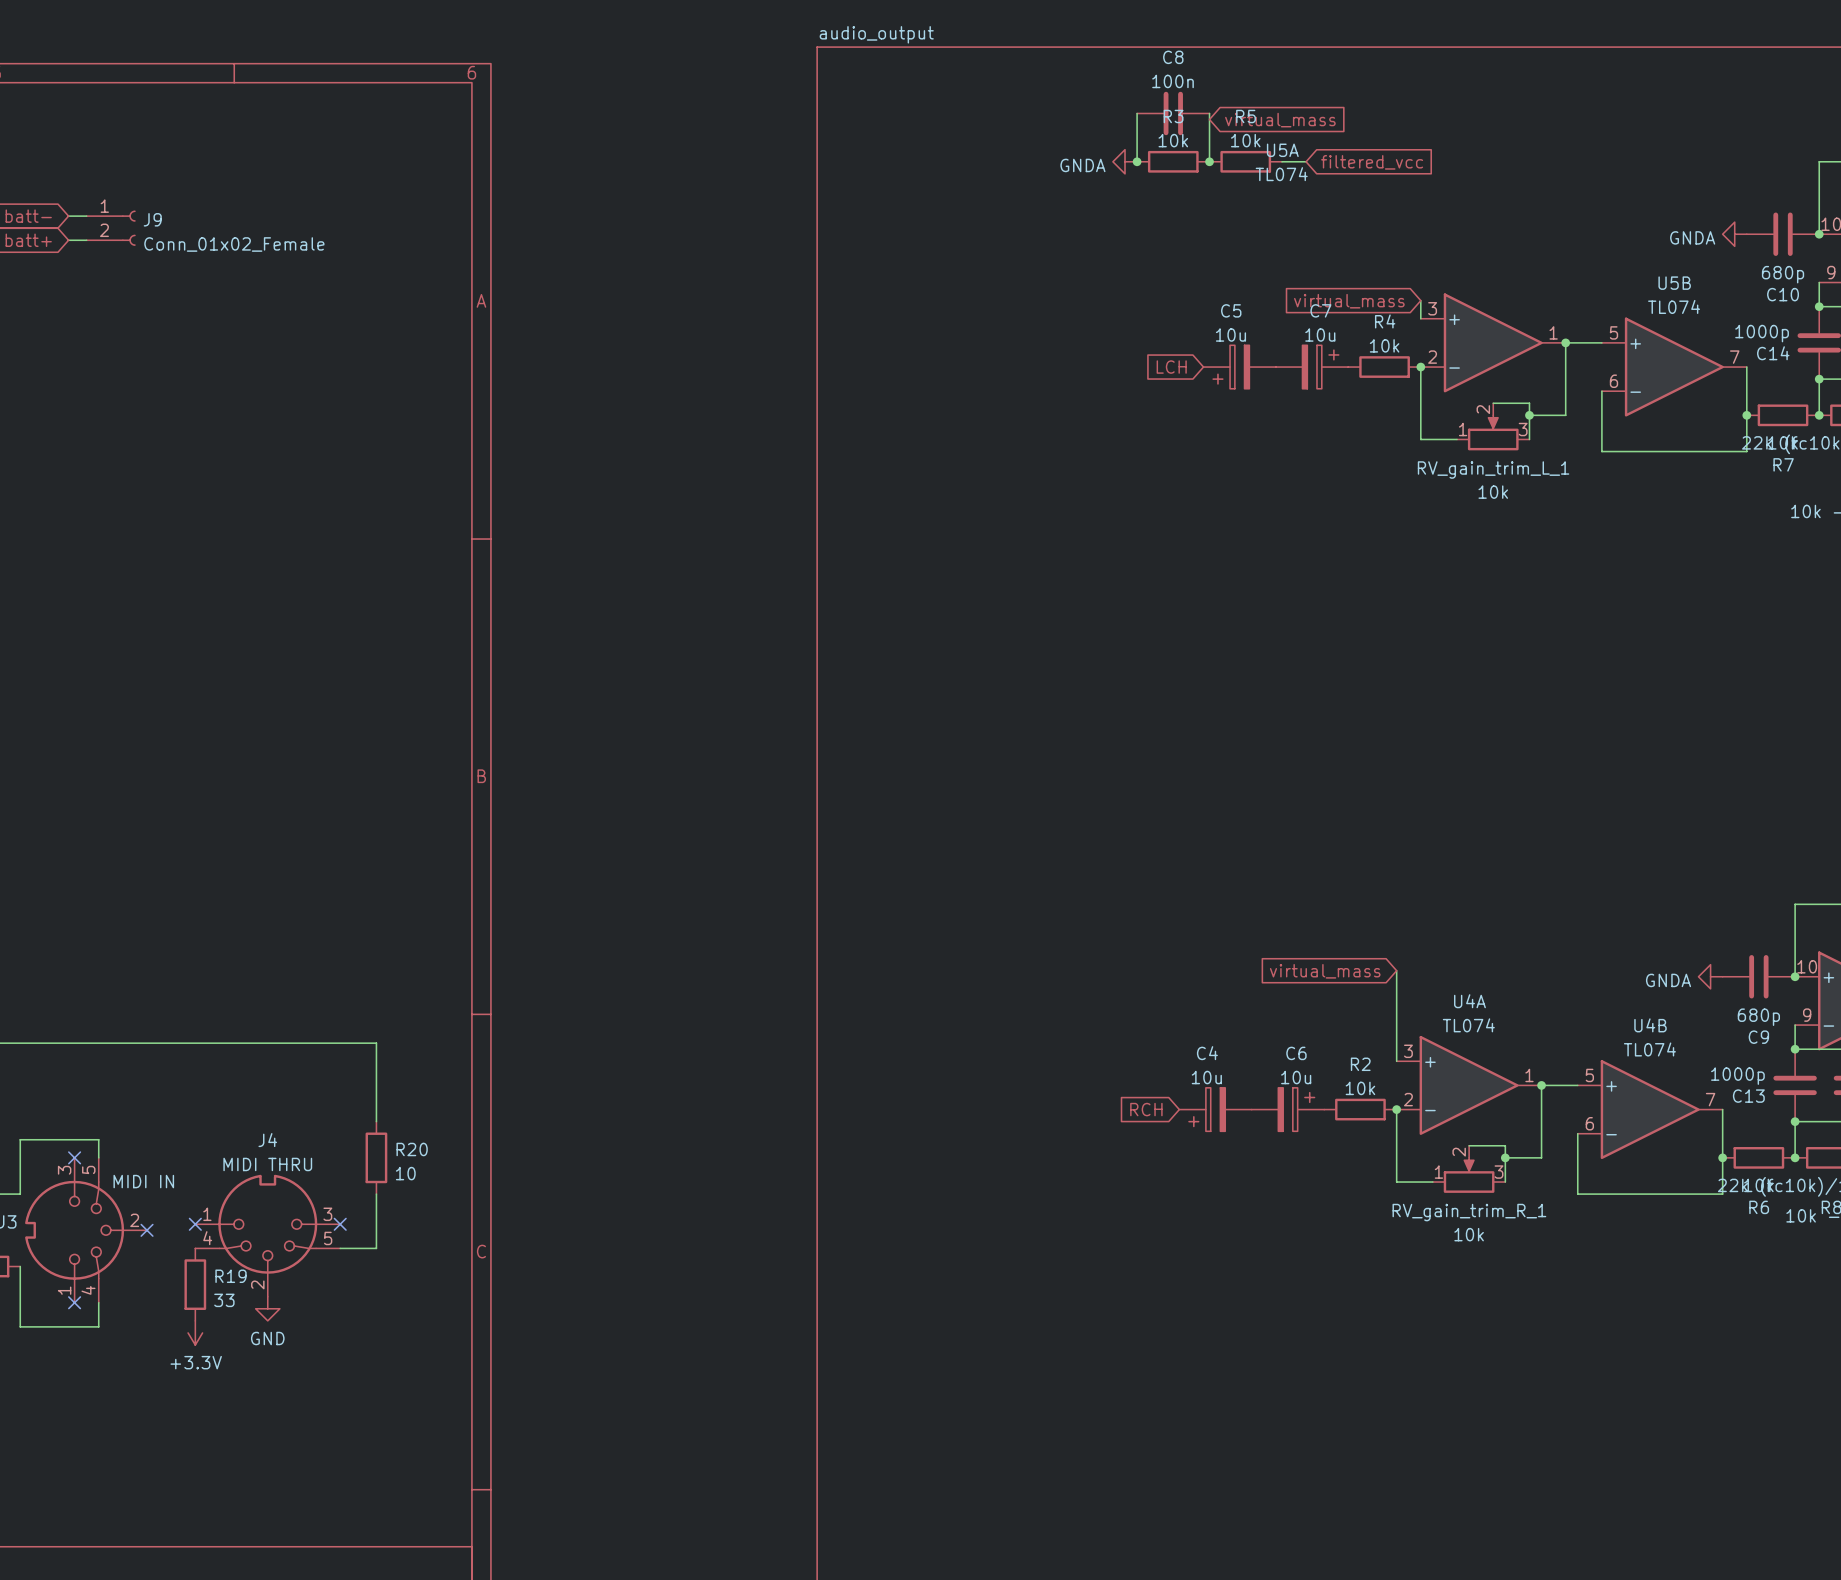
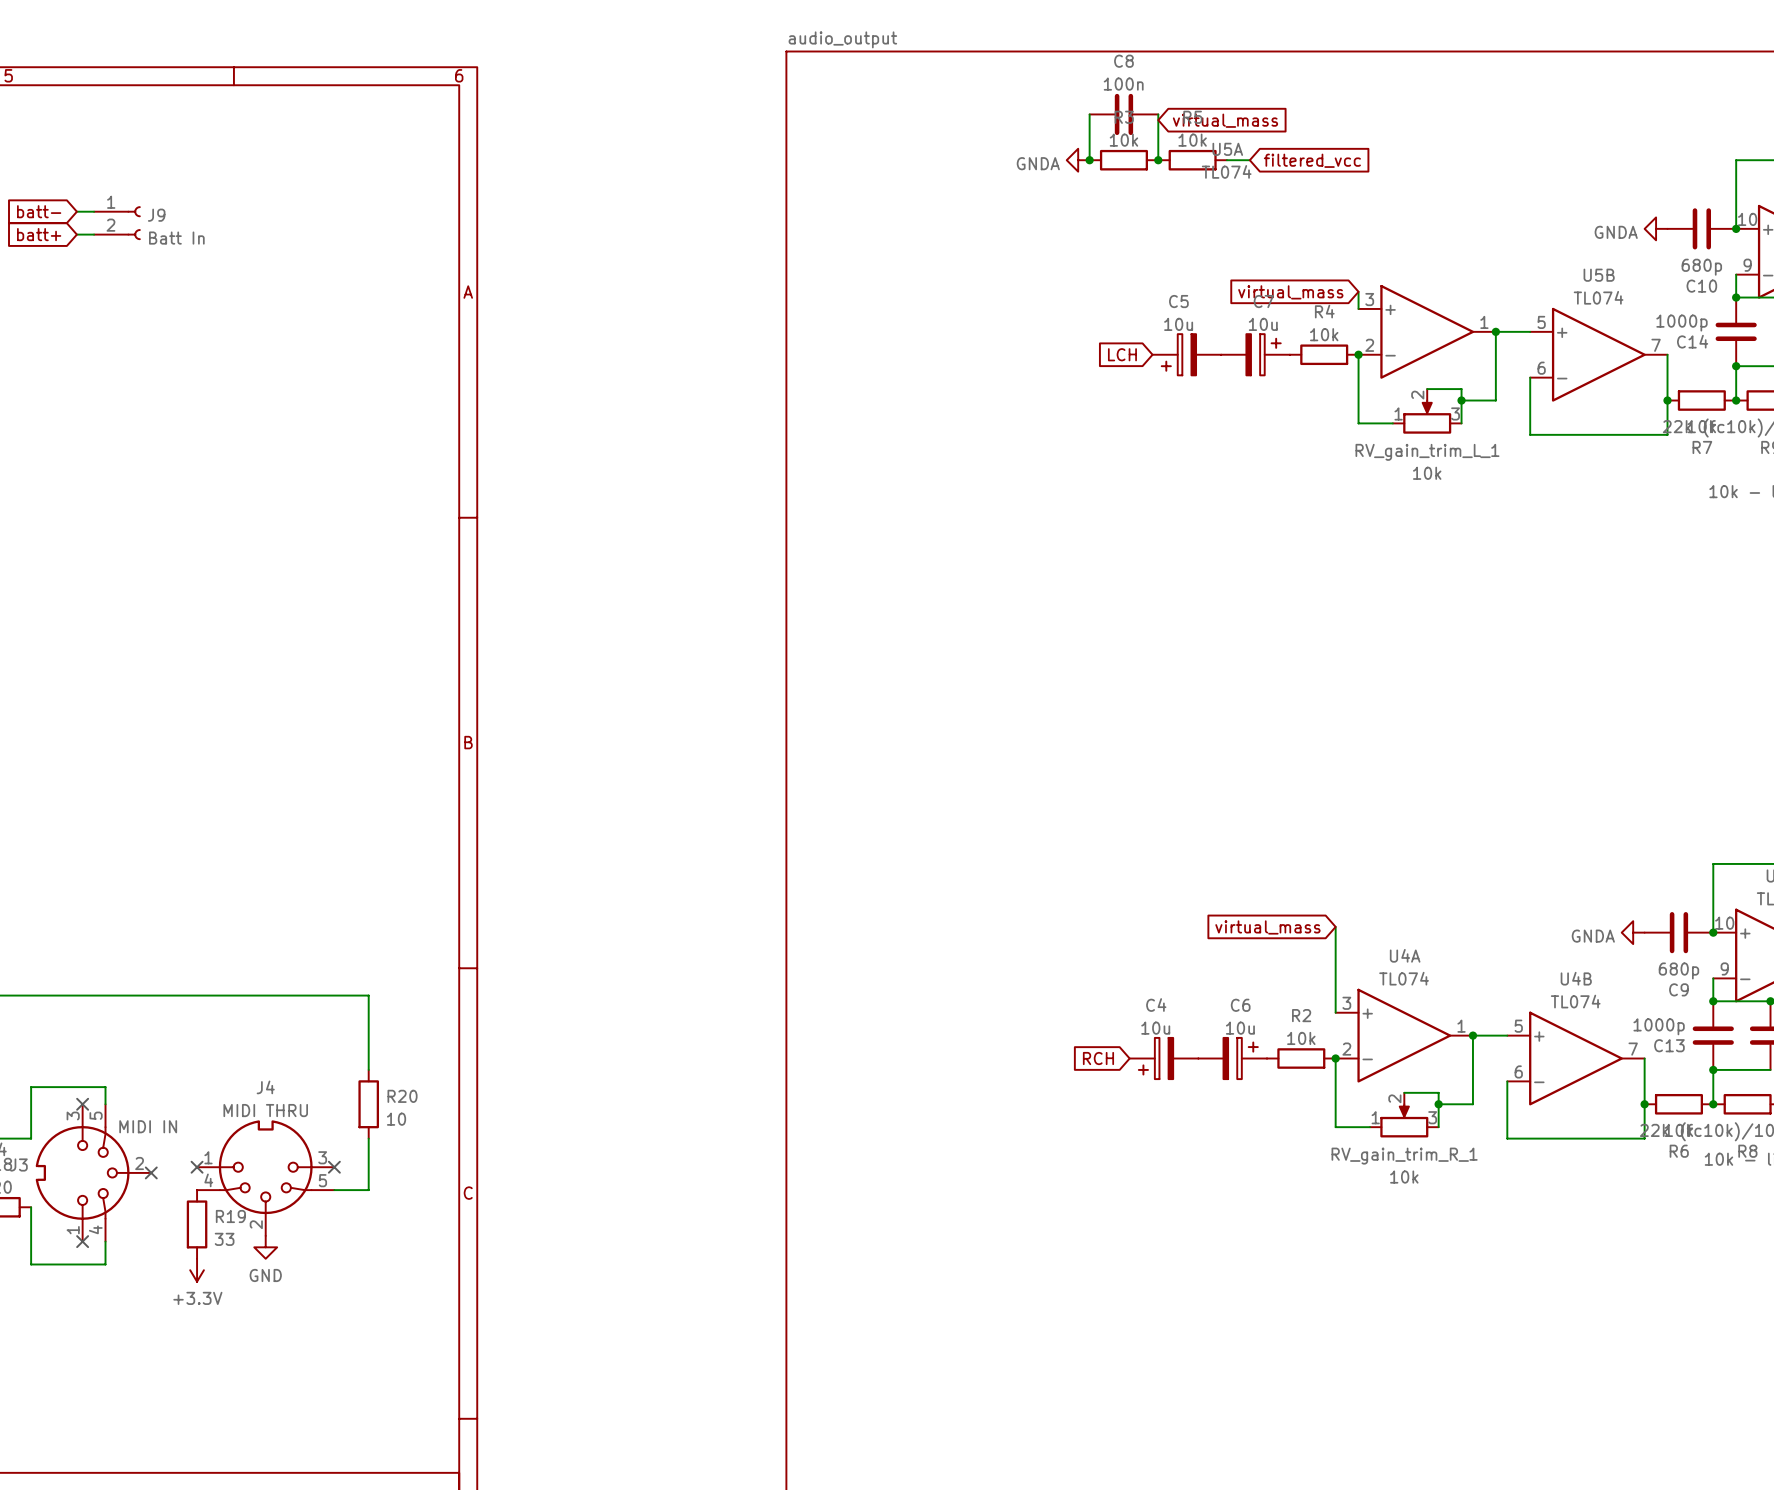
J9 value: Conn_01x02_Female (234, 244) -> Batt In (176, 238)

